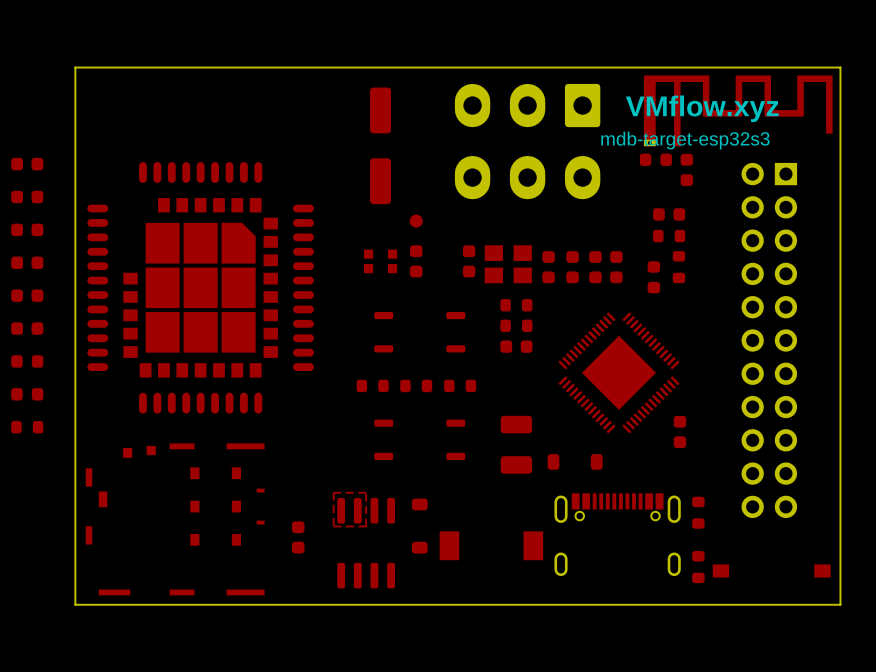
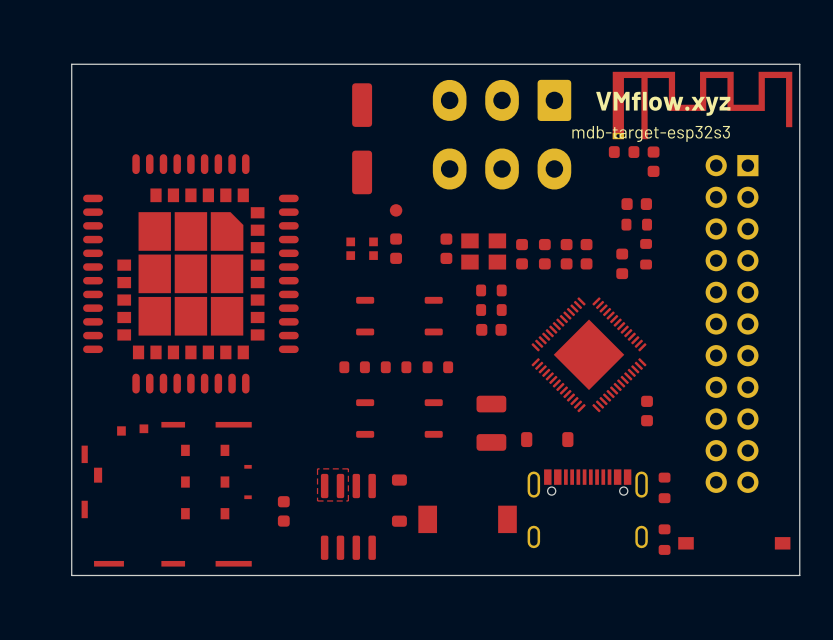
part: (27, 164) -> none
part: (27, 196) -> none
part: (27, 229) -> none
part: (27, 262) -> none
part: (27, 295) -> none
part: (27, 328) -> none
part: (27, 361) -> none
part: (27, 394) -> none
part: (27, 427) -> none

